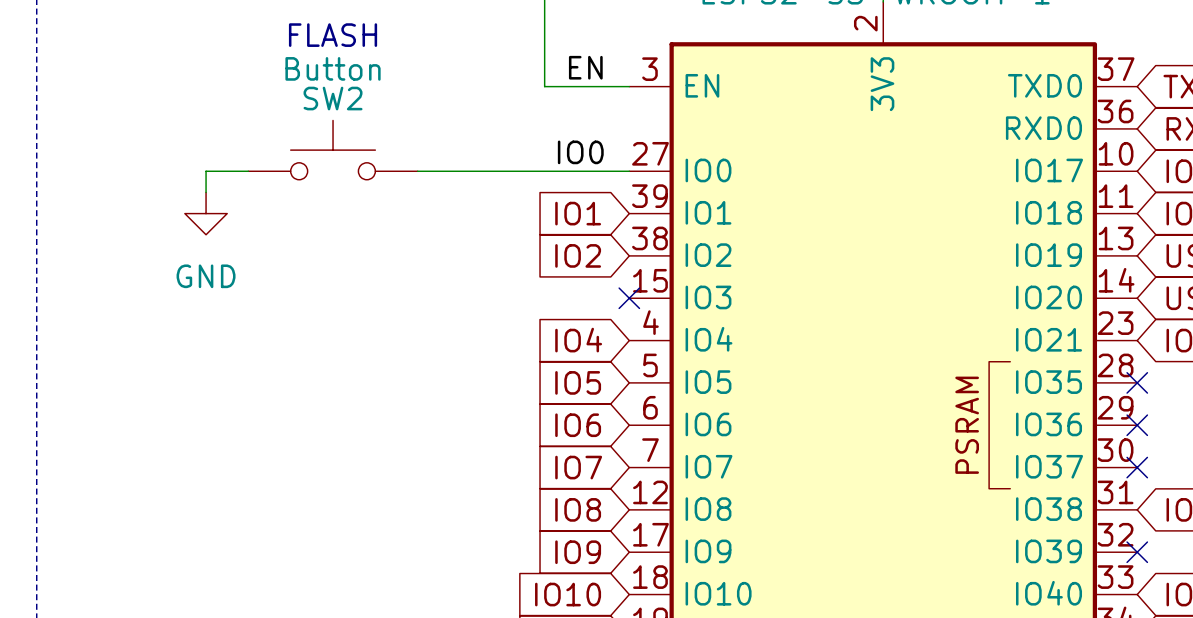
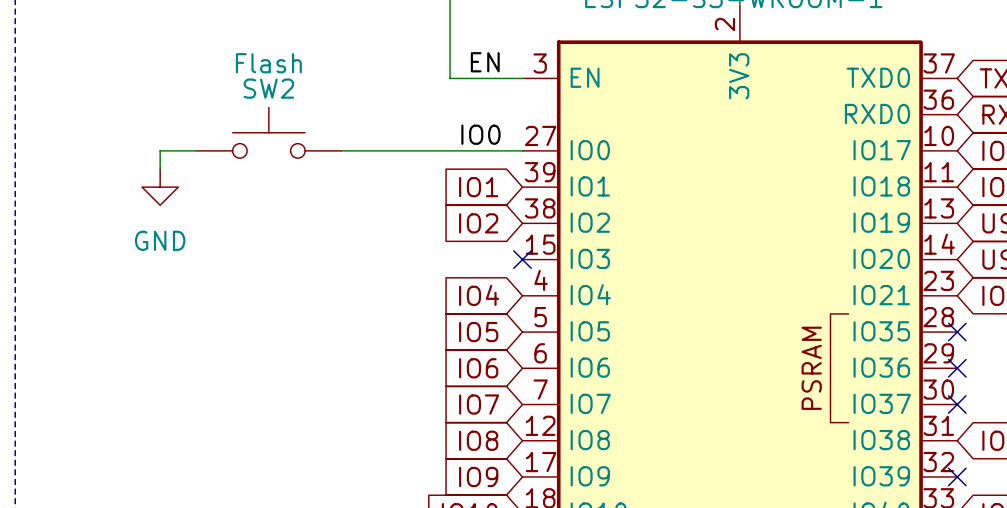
text: FLASH (333, 35) -> none
SW2 value: Button (333, 68) -> Flash (268, 63)

